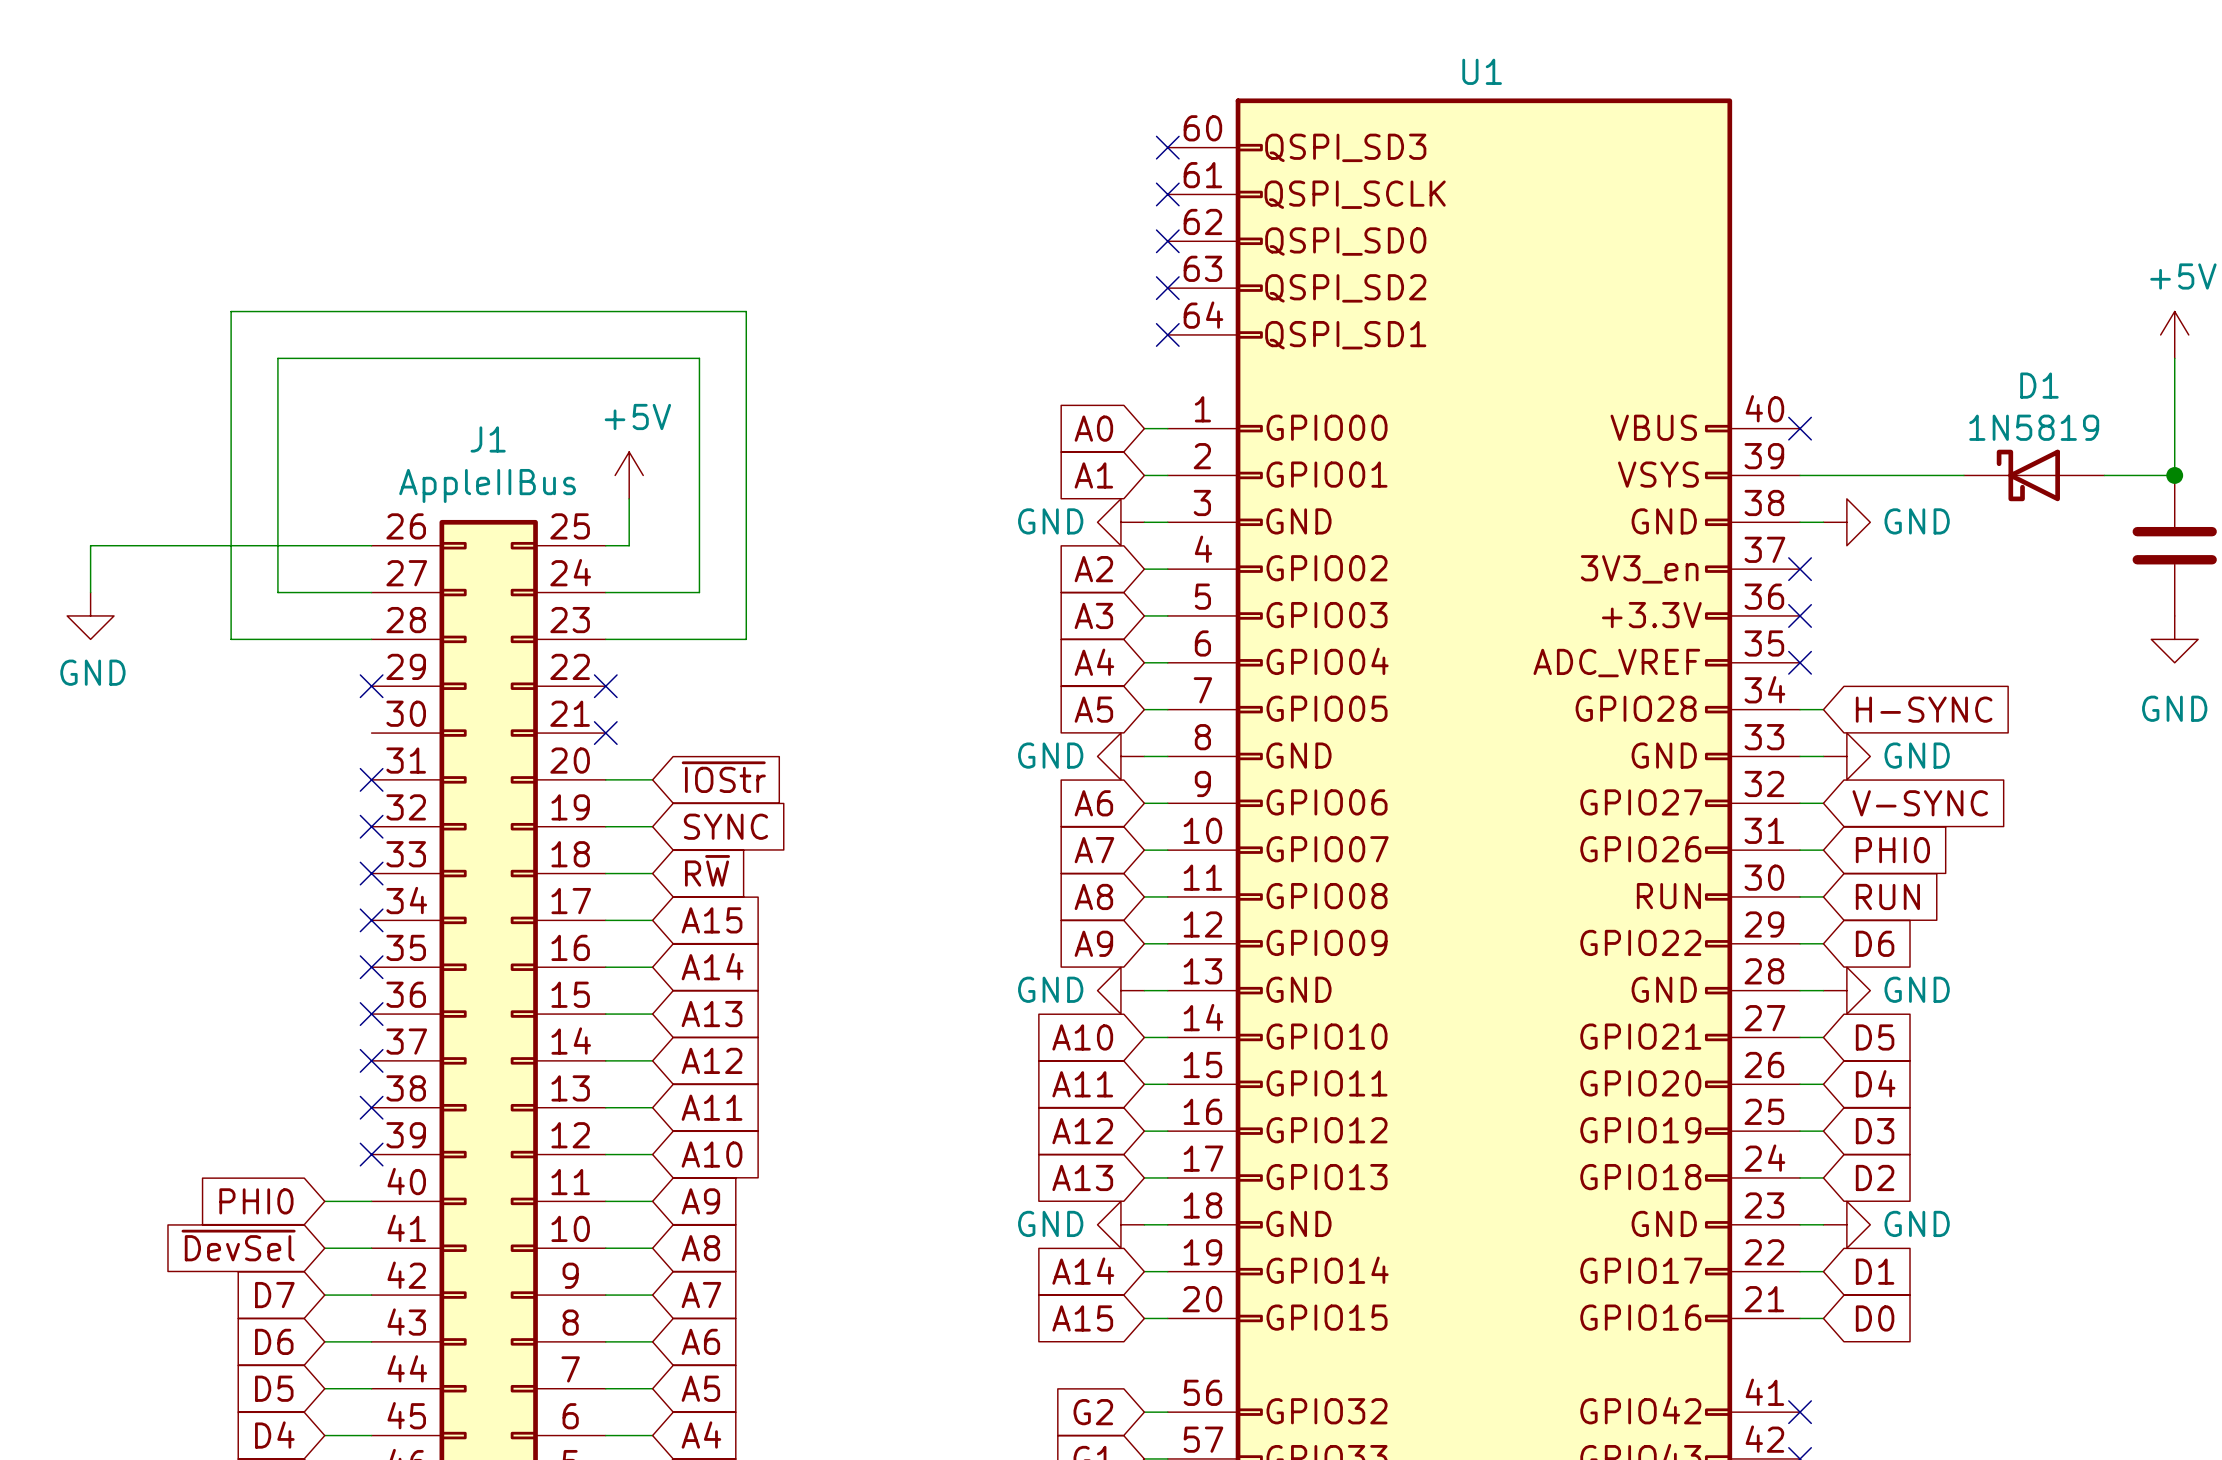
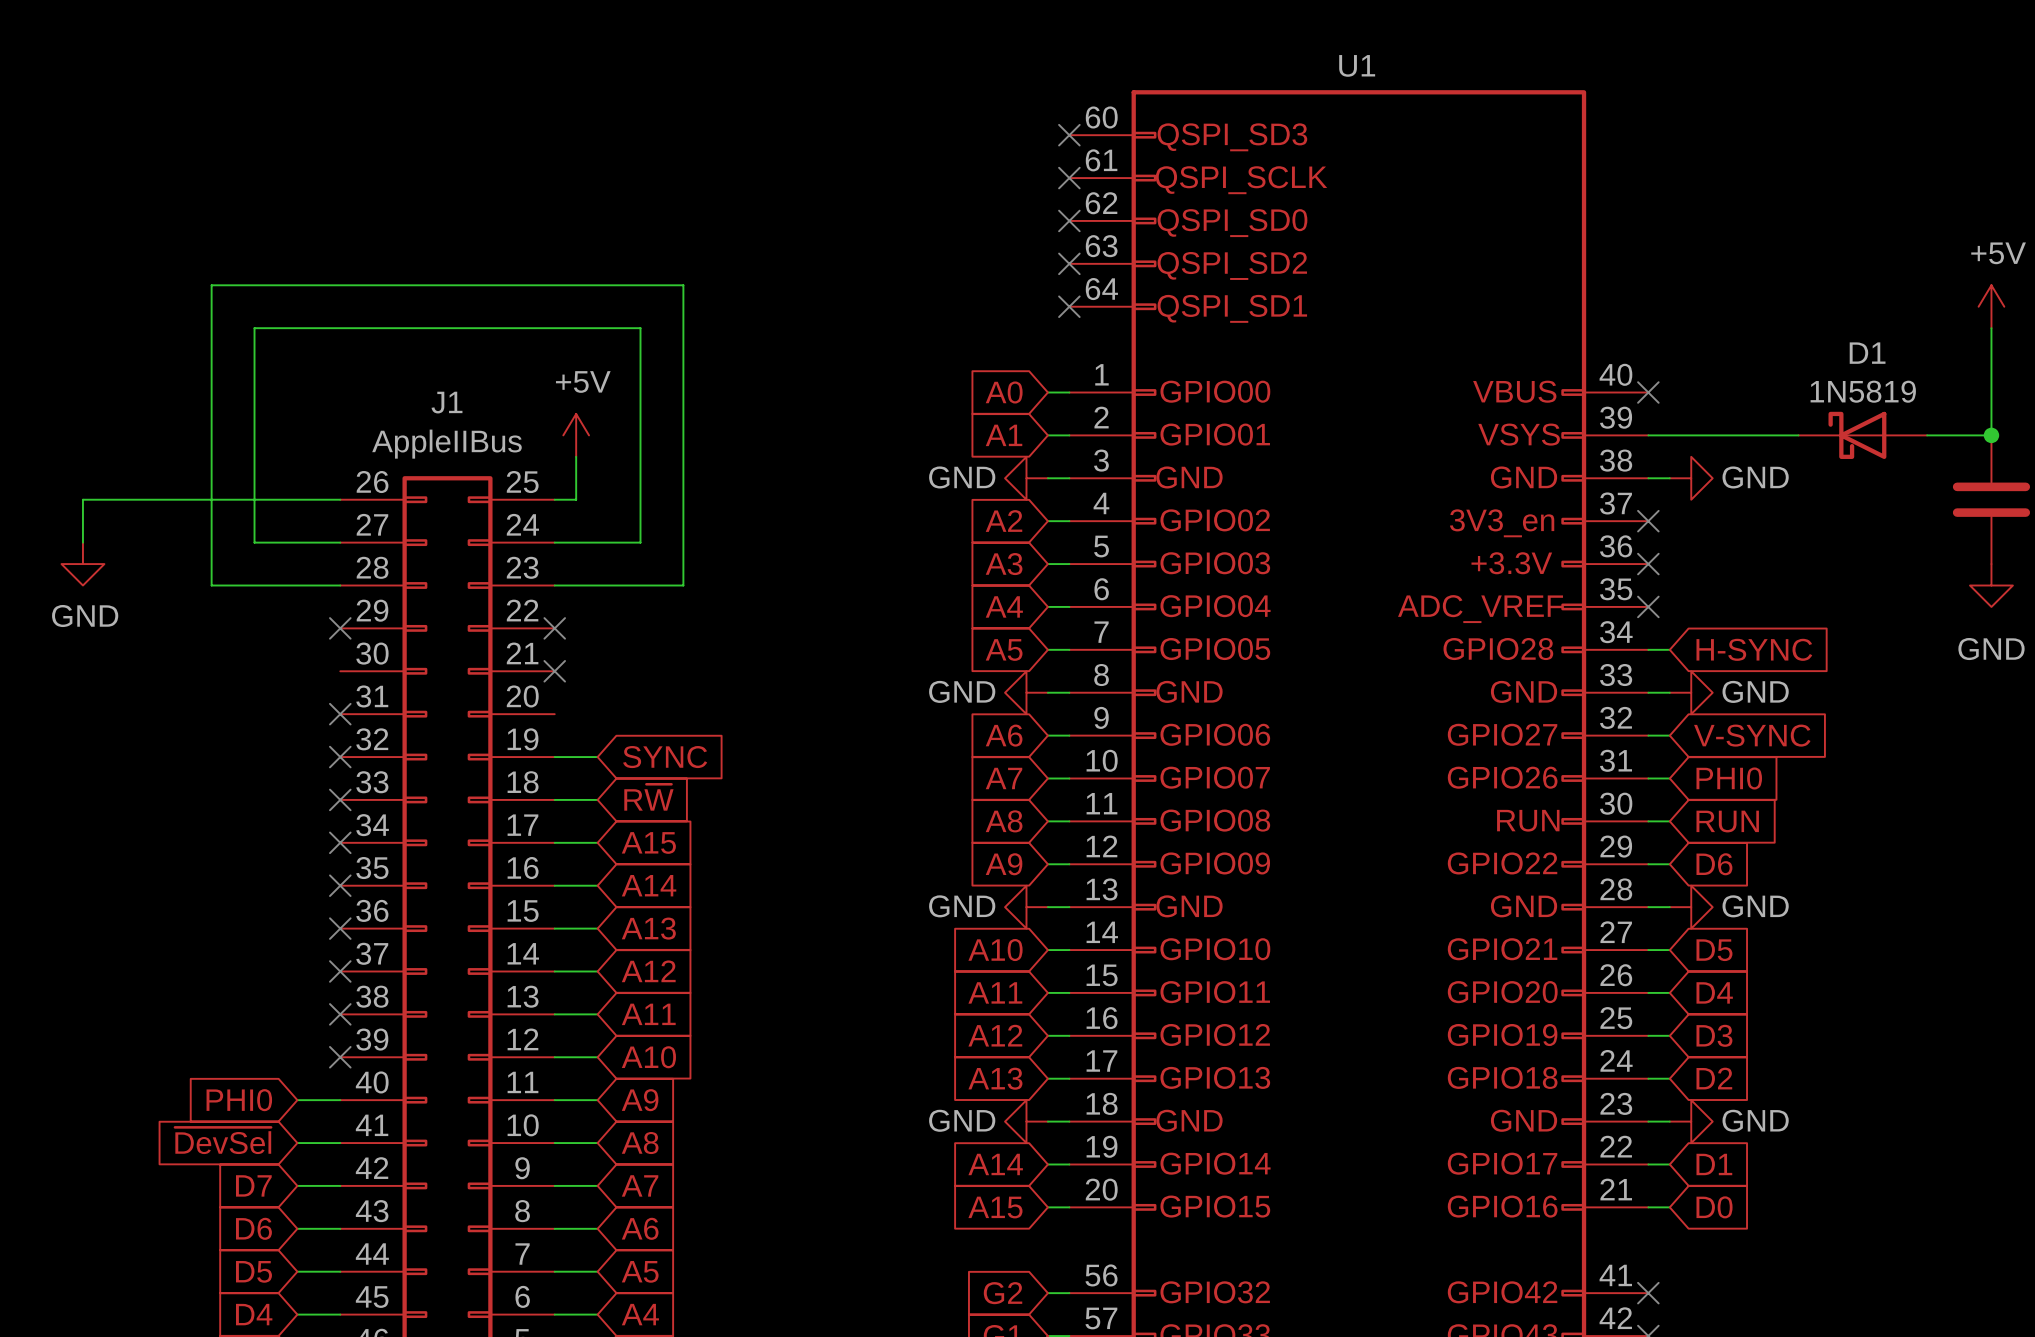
global label: ~{IOStr} (723, 777) -> none
wire: (605, 779) (652, 779) -> none

